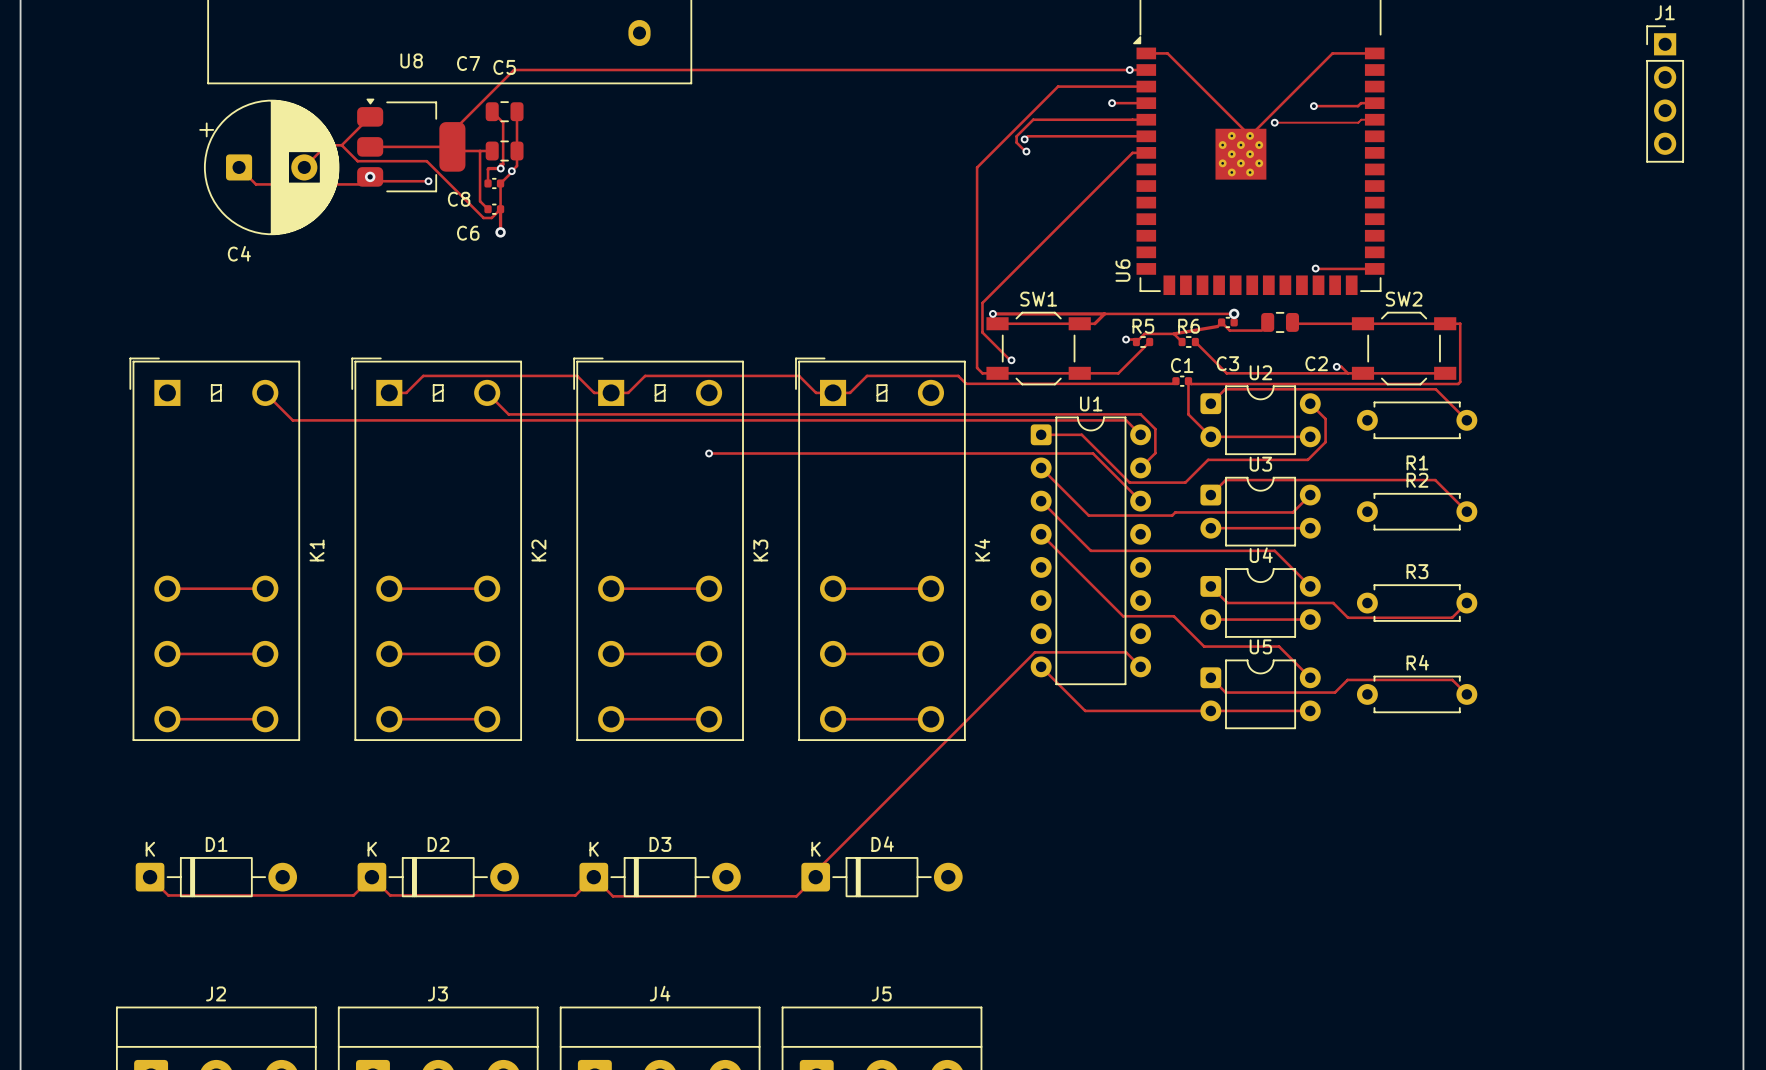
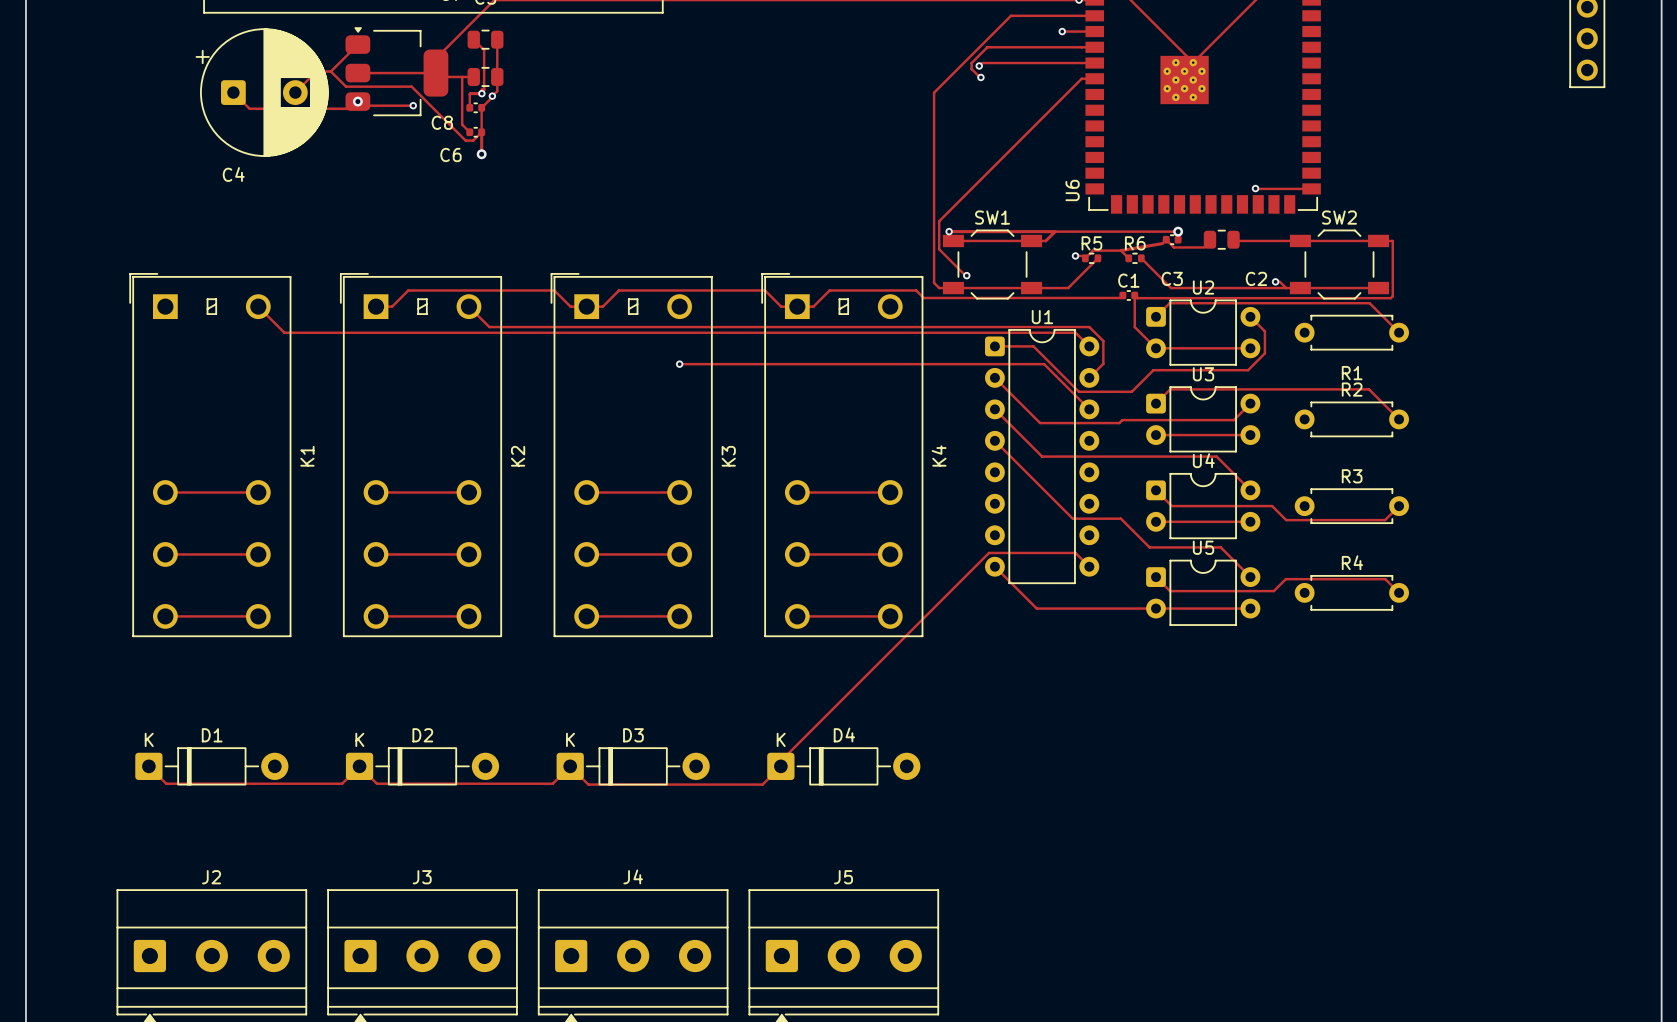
track: (1374, 103) (1360, 103) (1358, 106) (1313, 106) -> none
via: (1313, 106) -> none
track: (1374, 119) (1361, 119) (1358, 122) (1274, 122) -> none
via: (1274, 122) -> none

